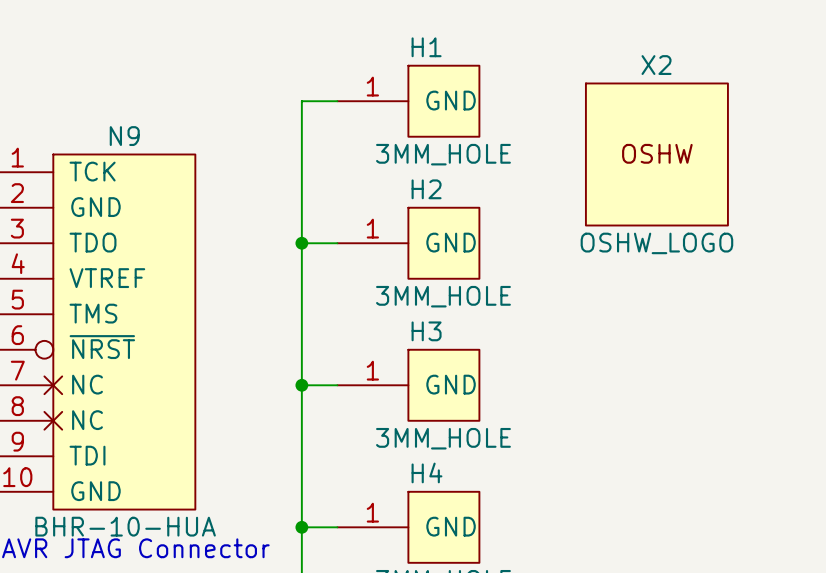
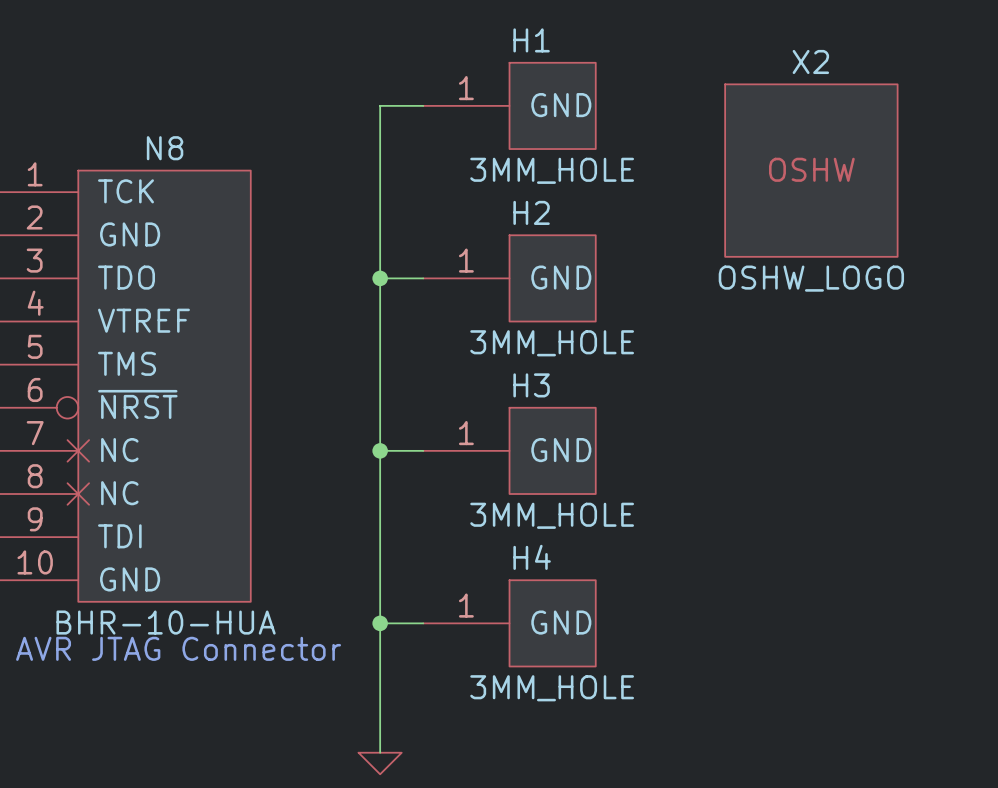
N9 name: N9 (124, 136) -> N8 (165, 148)

